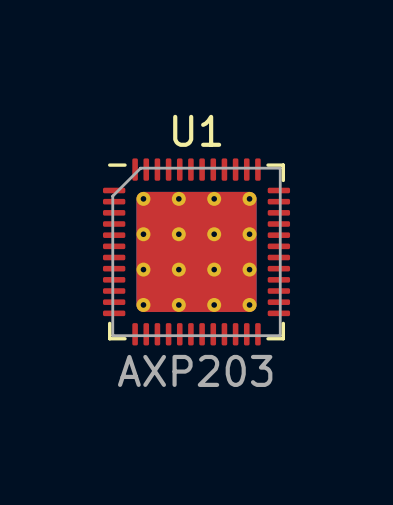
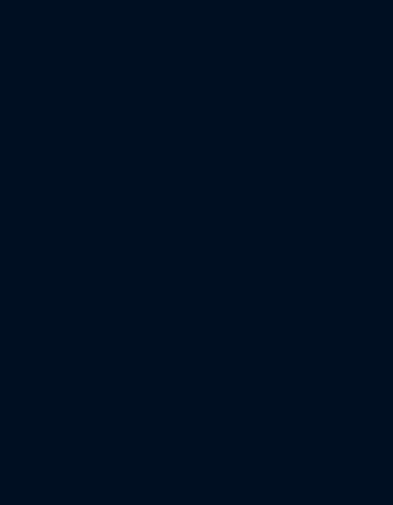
U1: AXP203 (196, 251) -> none

